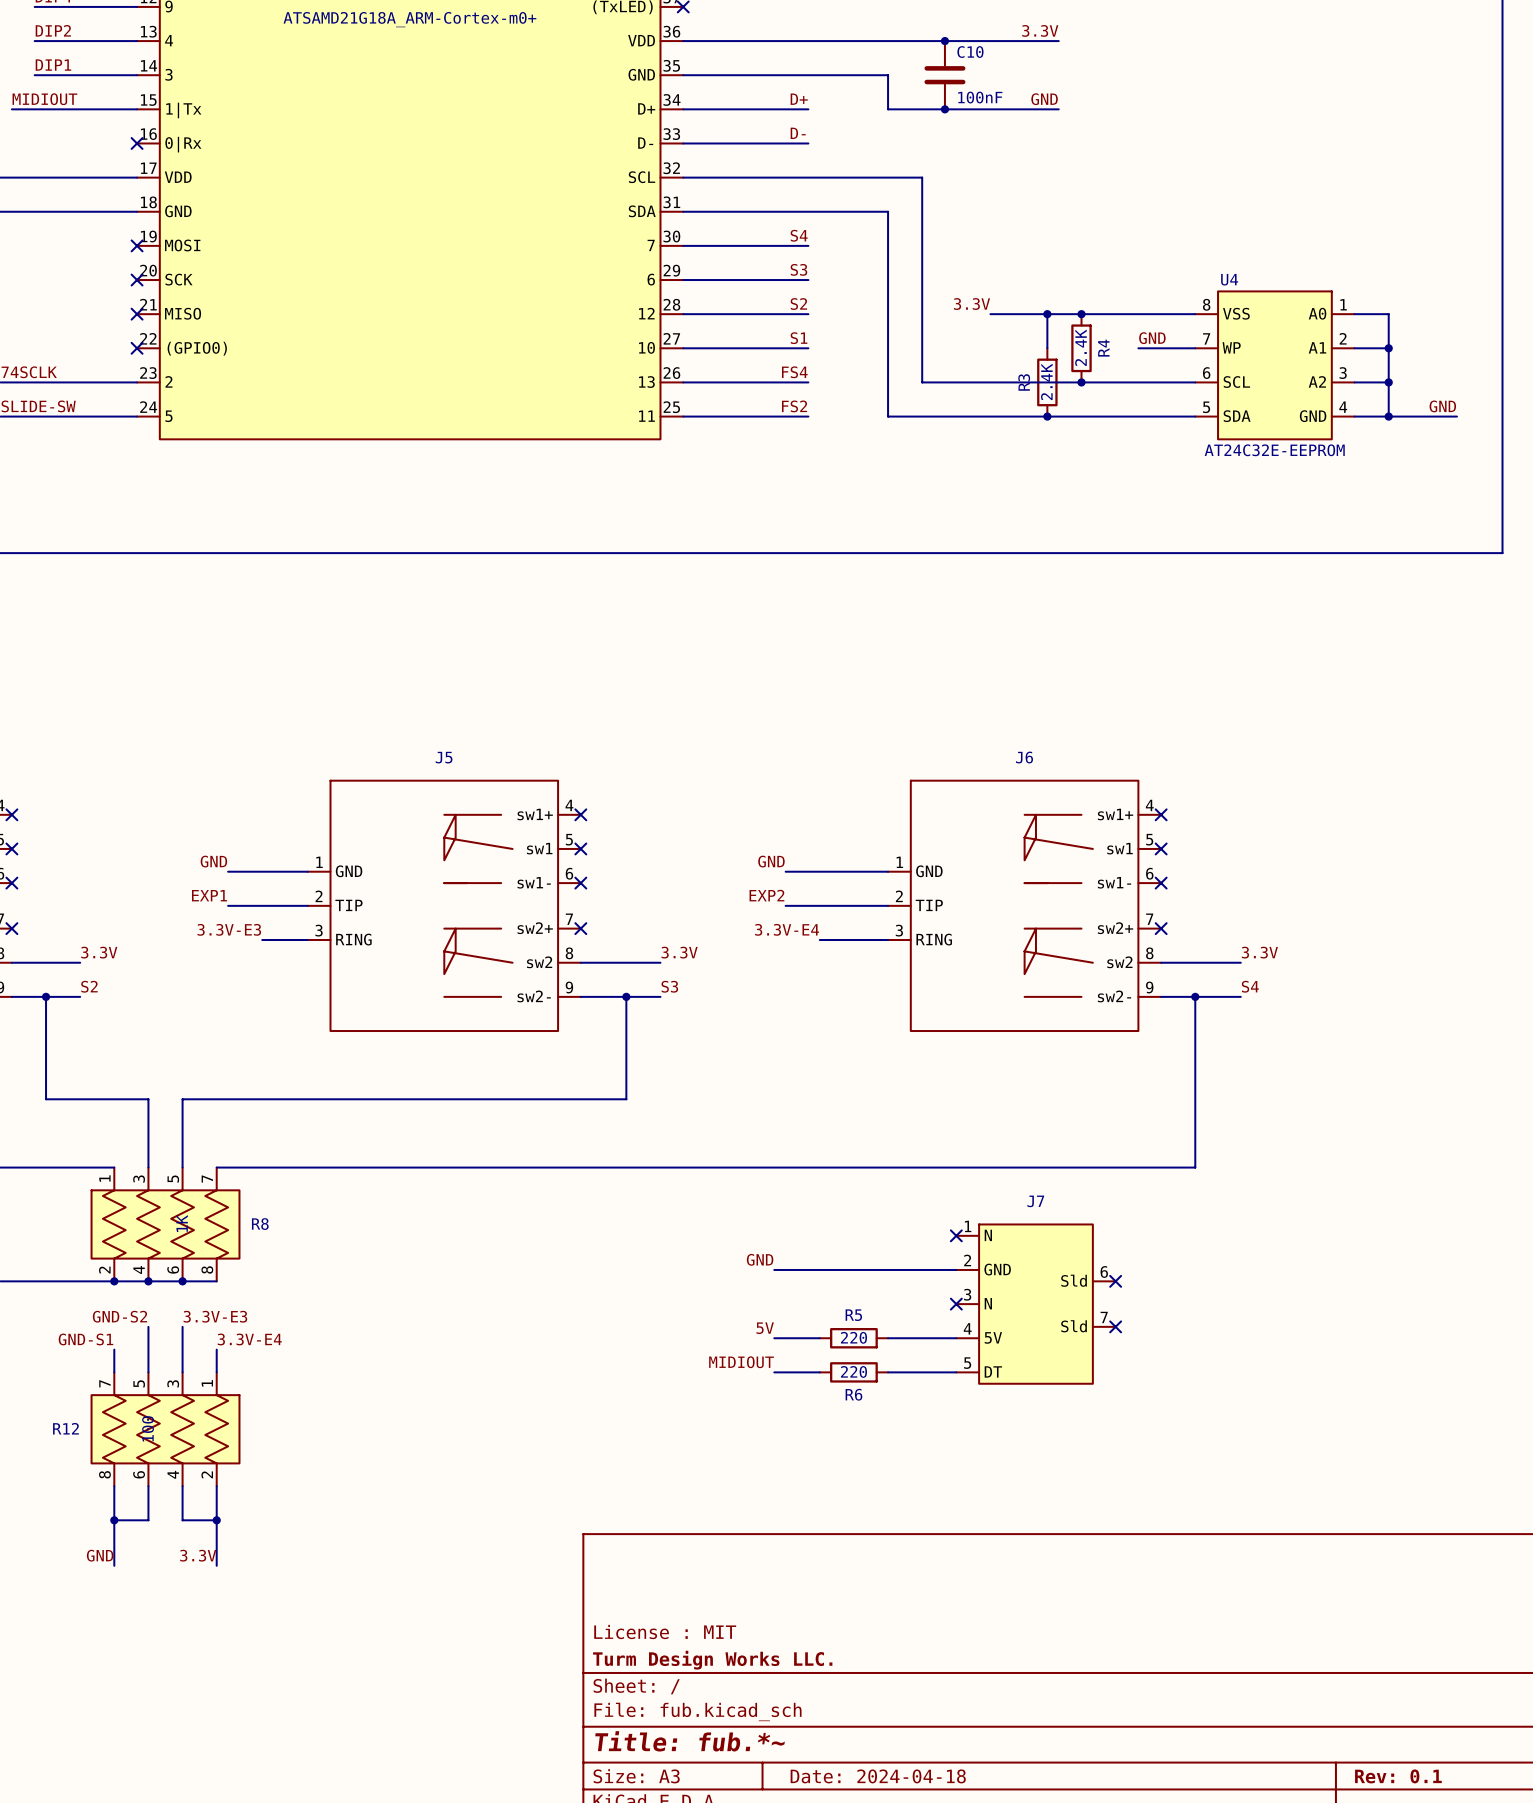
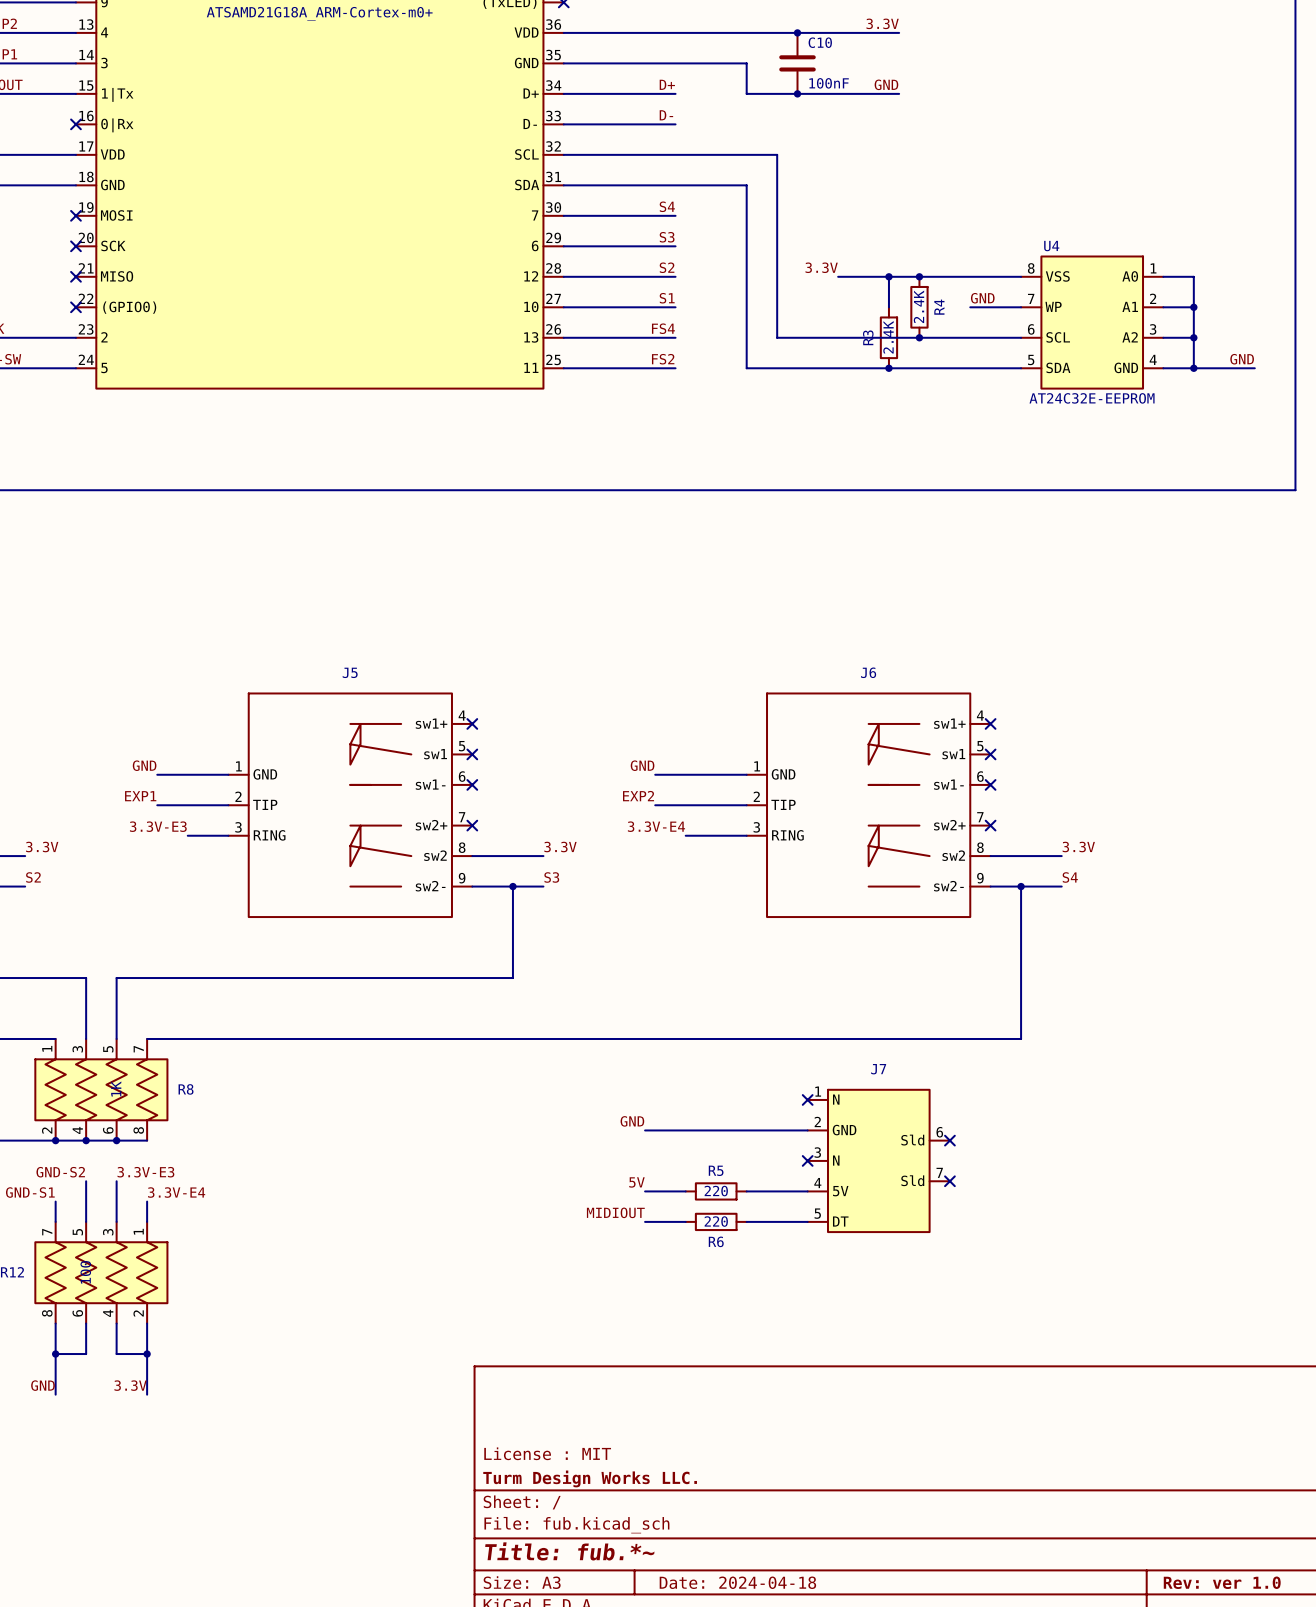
title block: Rev: 0.1 (1398, 1776) -> Rev: ver 1.0 (1222, 1582)

